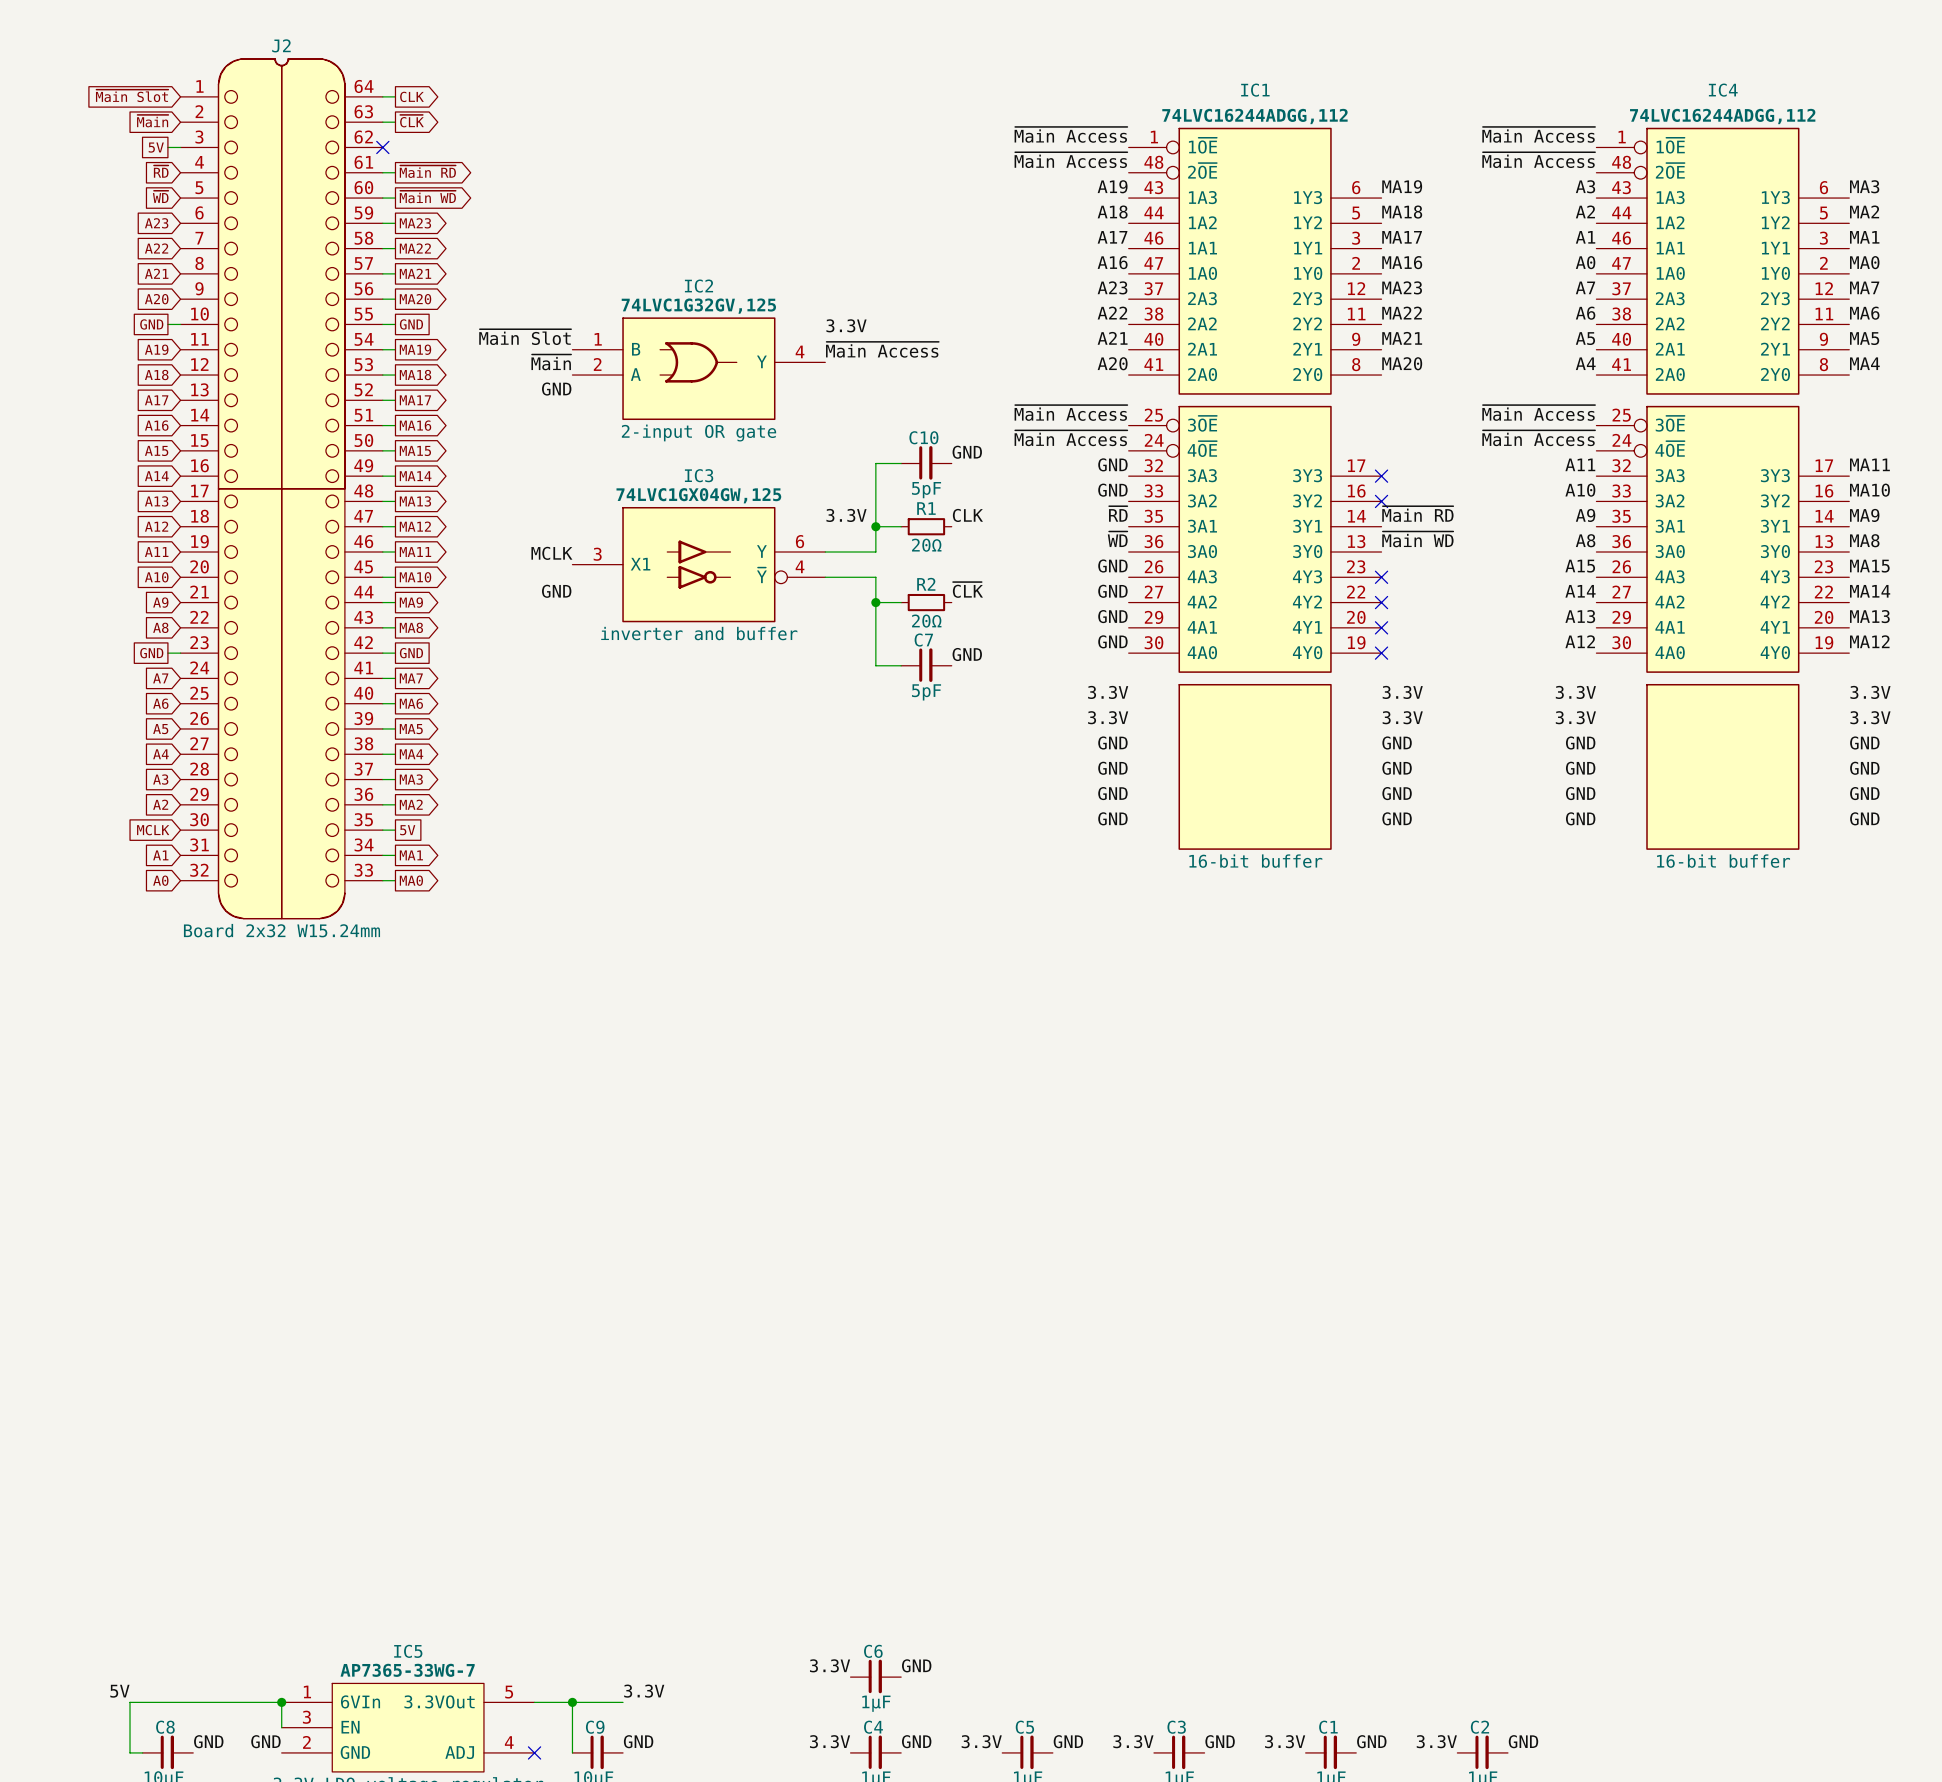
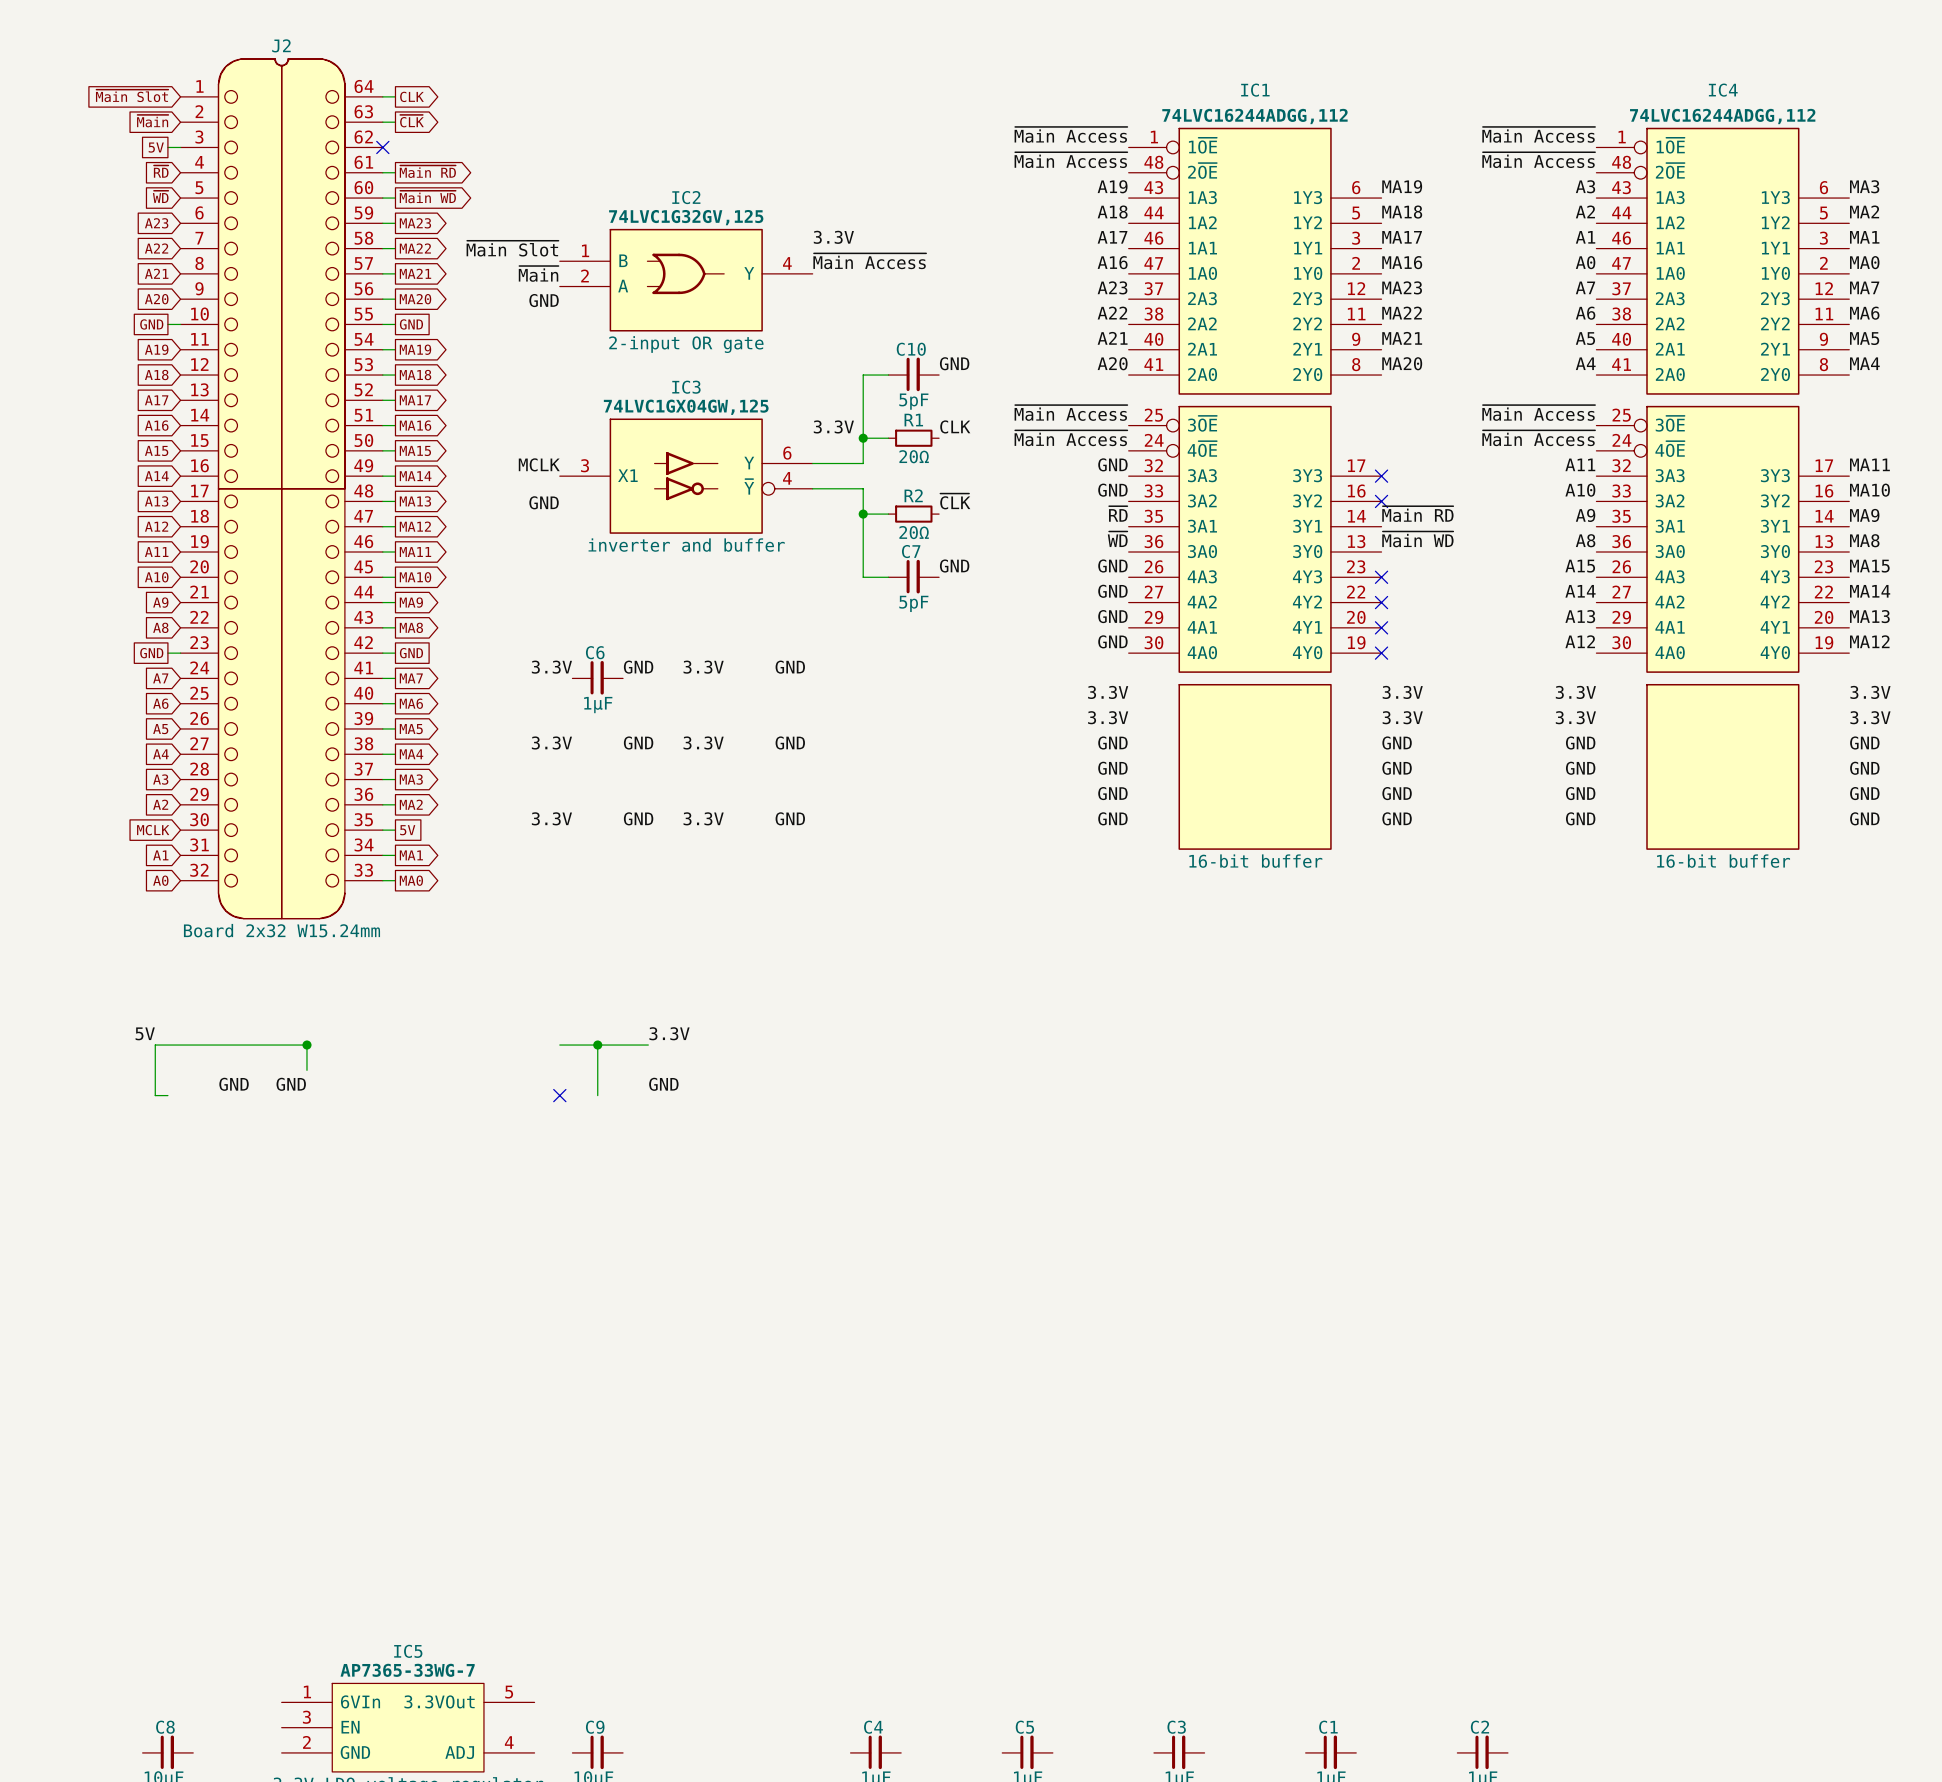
label: none -> 3.3V (833, 237)
label: none -> GND (544, 300)
label: 3.3V (846, 325) -> none
label position: ~{Main Slot} (525, 337) -> ~{Main Slot} (512, 248)
label position: ~{Main Access} (882, 349) -> ~{Main Access} (869, 261)
label position: ~{Main} (551, 362) -> ~{Main} (538, 273)
label: none -> GND (954, 363)
IC2 position: (698, 368) -> (686, 280)
label: GND (556, 389) -> none
label: none -> 3.3V (833, 426)
junction: none -> (863, 438)
label: GND (967, 452) -> none
C10 position: (926, 462) -> (913, 374)
wire: (901, 463) (875, 463) (875, 552) (825, 552) -> (888, 375) (863, 375) (863, 463) (812, 463)
label: none -> GND (544, 502)
label: 3.3V (846, 515) -> none
label position: CLK (967, 515) -> CLK (955, 426)
wire: (875, 526) (901, 526) -> (863, 438) (888, 438)
junction position: (875, 526) -> (863, 514)
R1 position: (926, 526) -> (913, 438)
label position: MCLK (551, 553) -> MCLK (539, 464)
IC3 position: (698, 564) -> (686, 476)
label: none -> GND (954, 566)
wire: (825, 577) (863, 577) -> (812, 488) (863, 488) (863, 577)
wire: (875, 577) (875, 665) (901, 665) -> (875, 577) (888, 577)
label position: ~{CLK} (967, 589) -> ~{CLK} (955, 501)
label: GND (556, 591) -> none
wire: (875, 602) (901, 602) -> (863, 514) (888, 514)
junction: (875, 602) -> none
R2 position: (926, 602) -> (913, 514)
label: GND (967, 654) -> none
C7 position: (926, 665) -> (913, 576)
label: none -> 3.3V (551, 667)
label: none -> GND (638, 667)
label: none -> 3.3V (703, 667)
label: none -> GND (790, 667)
label: none -> 3.3V (551, 742)
label: none -> GND (638, 742)
label: none -> 3.3V (703, 742)
label: none -> GND (790, 742)
label: none -> 3.3V (551, 818)
label: none -> GND (638, 818)
label: none -> 3.3V (703, 818)
label: none -> GND (790, 818)
label: none -> 5V (145, 1033)
label: none -> 3.3V (669, 1033)
junction: none -> (306, 1045)
wire: none -> (559, 1045) (648, 1045)
wire: none -> (597, 1045) (597, 1095)
junction: none -> (597, 1045)
wire: none -> (306, 1070) (306, 1045) (155, 1045) (155, 1095) (167, 1095)
label: none -> GND (234, 1084)
label: none -> GND (291, 1084)
label: none -> GND (663, 1084)
no-connect mark: none -> (559, 1095)
label: 3.3V (830, 1665) -> none
label: GND (916, 1665) -> none
C6 position: (875, 1676) -> (597, 677)
label: 5V (119, 1691) -> none
label: 3.3V (644, 1691) -> none
junction: (281, 1702) -> none
wire: (534, 1702) (623, 1702) -> none
wire: (572, 1702) (572, 1752) -> none
junction: (572, 1702) -> none
wire: (281, 1727) (281, 1702) (130, 1702) (130, 1752) (142, 1752) -> none
label: GND (208, 1741) -> none
label: GND (265, 1741) -> none
label: GND (638, 1741) -> none
label: 3.3V (830, 1741) -> none
label: GND (916, 1741) -> none
label: 3.3V (981, 1741) -> none
label: GND (1068, 1741) -> none
label: 3.3V (1133, 1741) -> none
label: GND (1220, 1741) -> none
label: 3.3V (1285, 1741) -> none
label: GND (1371, 1741) -> none
label: 3.3V (1436, 1741) -> none
label: GND (1523, 1741) -> none
no-connect mark: (534, 1752) -> none

